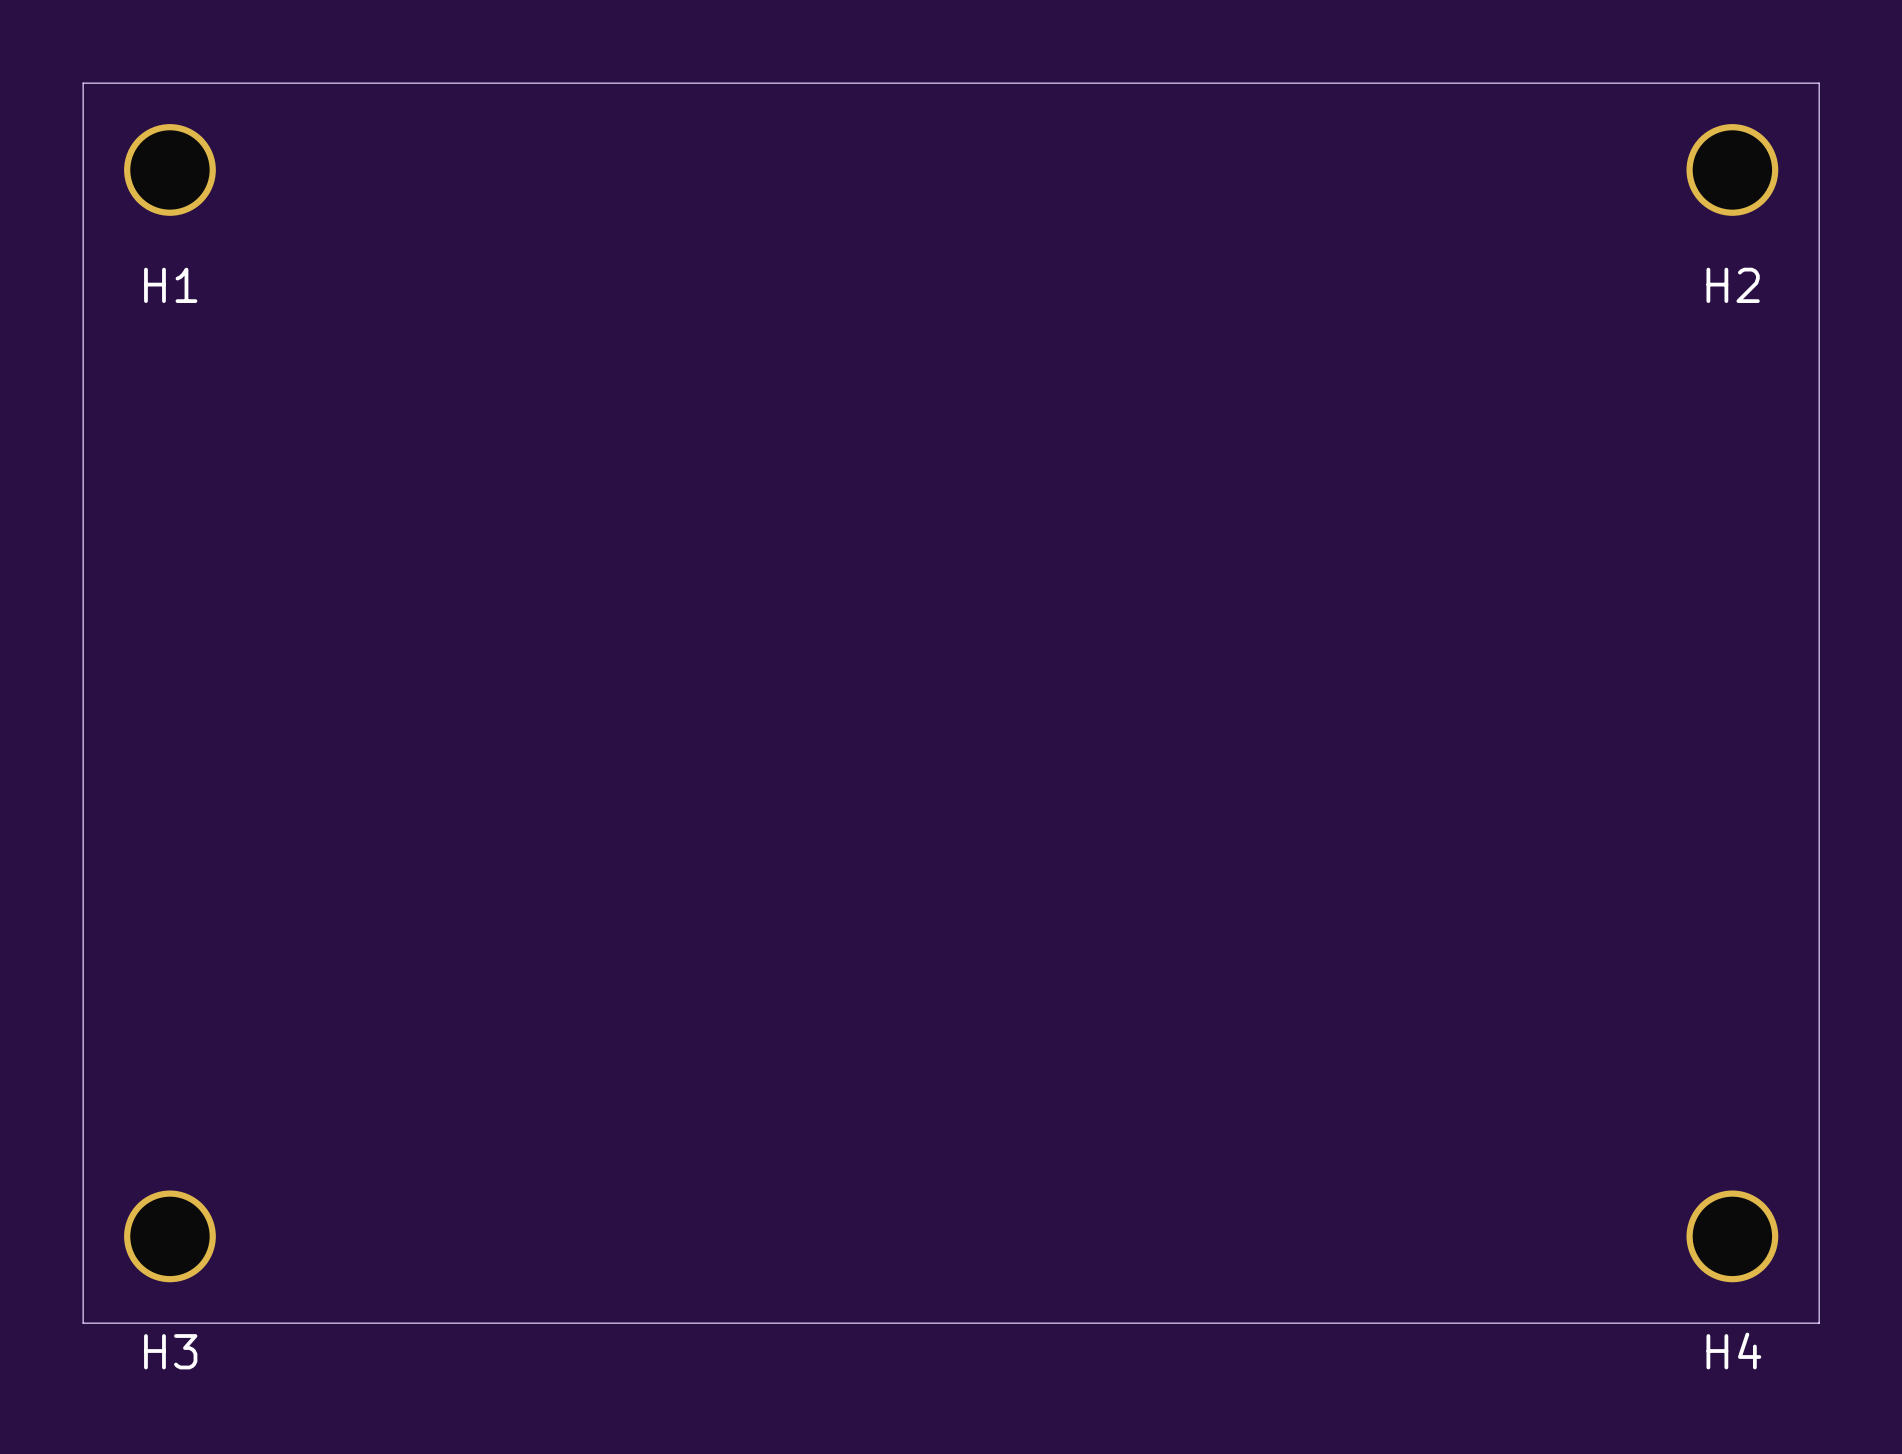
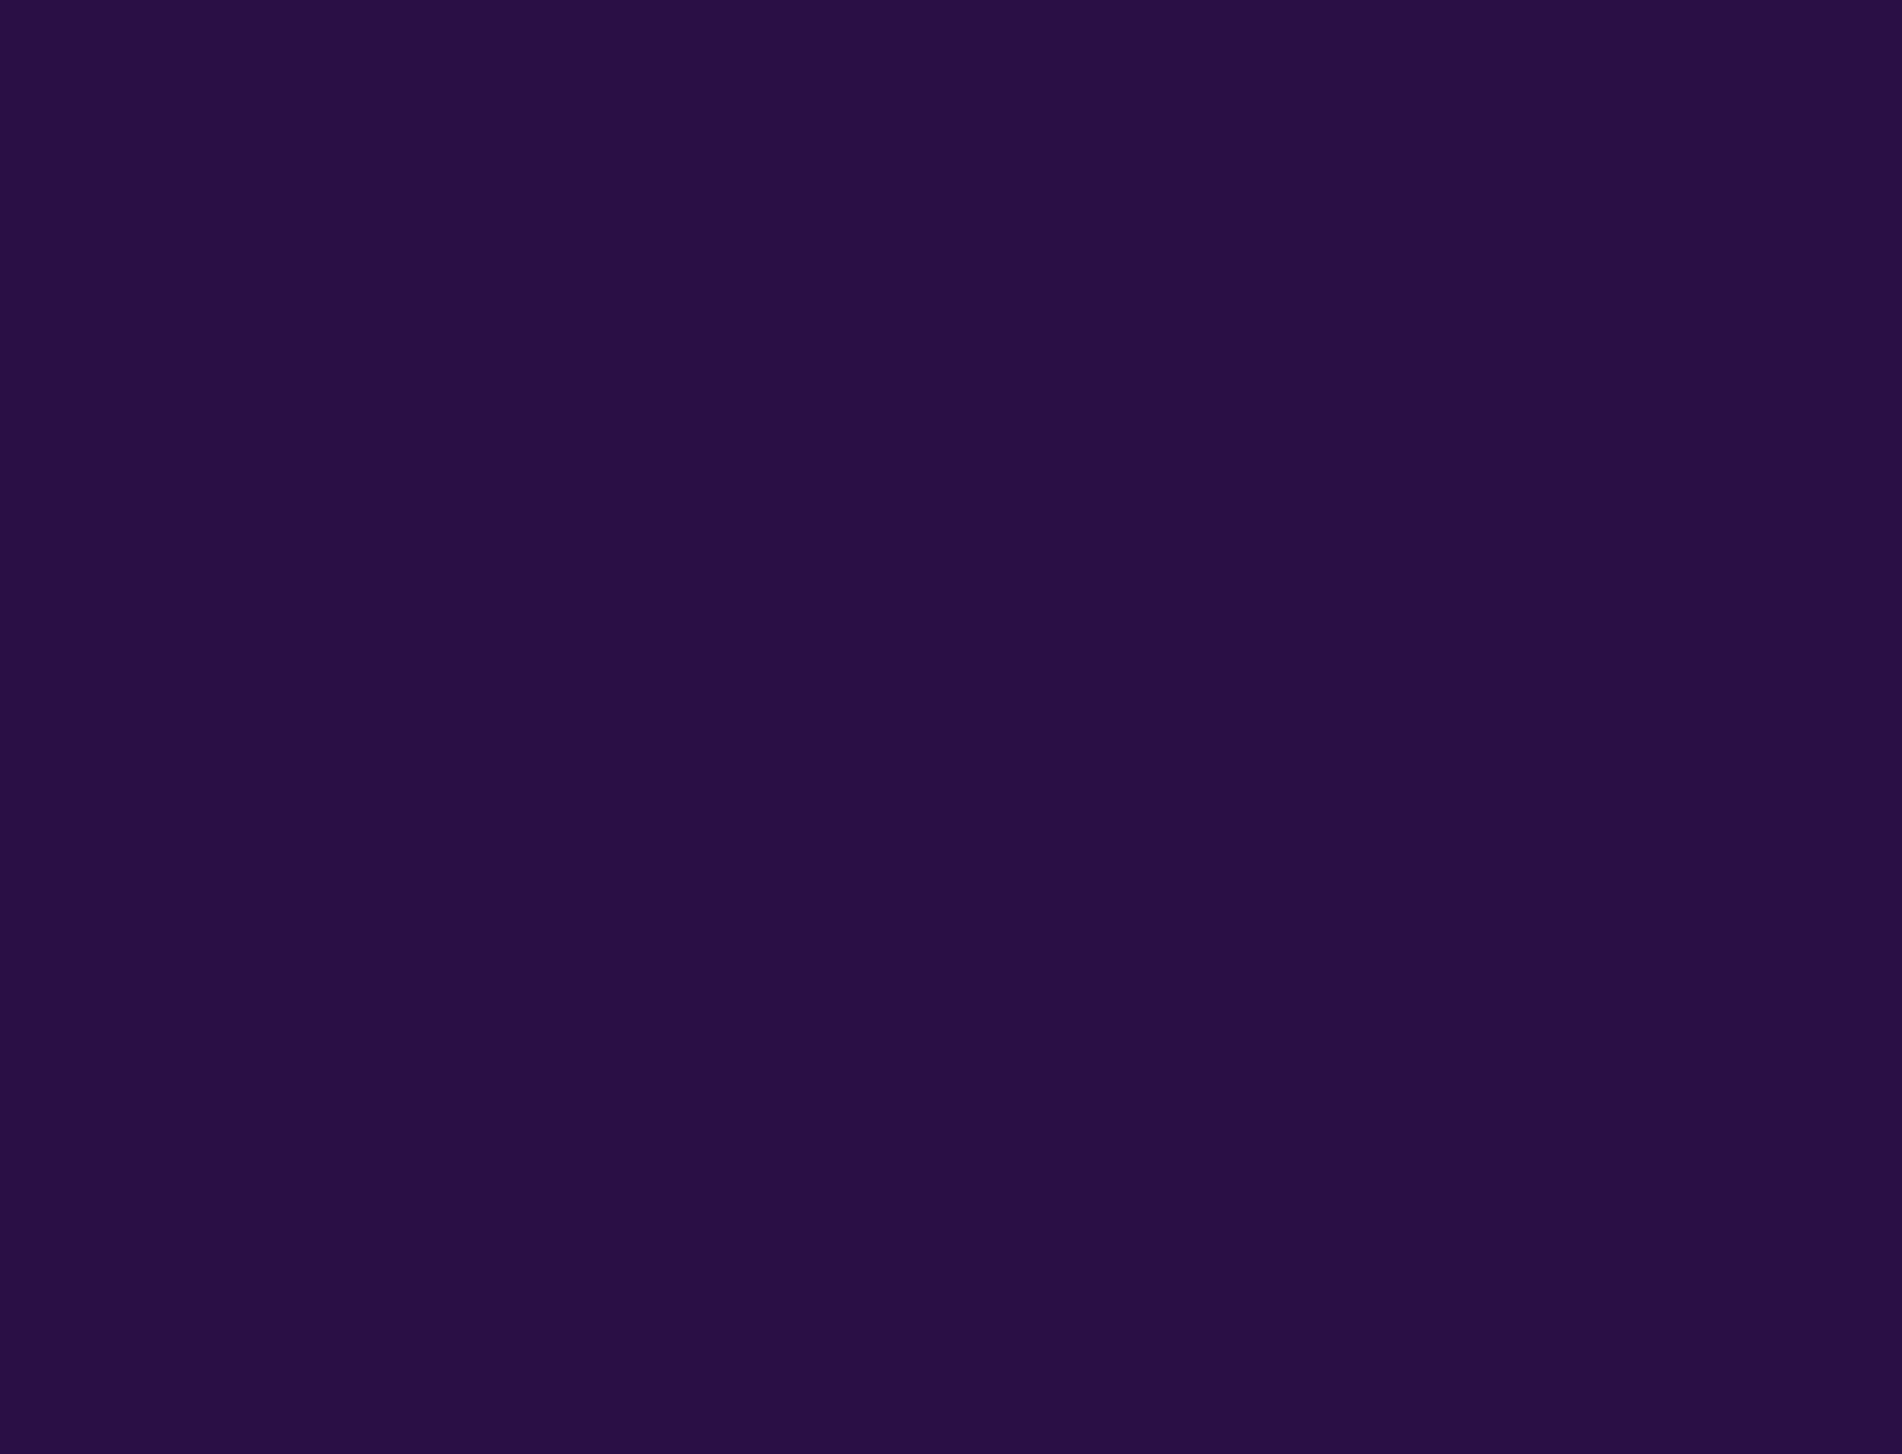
board edge: (83, 83) (1819, 83) (1819, 1323) (83, 1323) (83, 83) -> none
H1: (169, 169) -> none
H2: (1732, 169) -> none
H3: (169, 1236) -> none
H4: (1732, 1236) -> none

